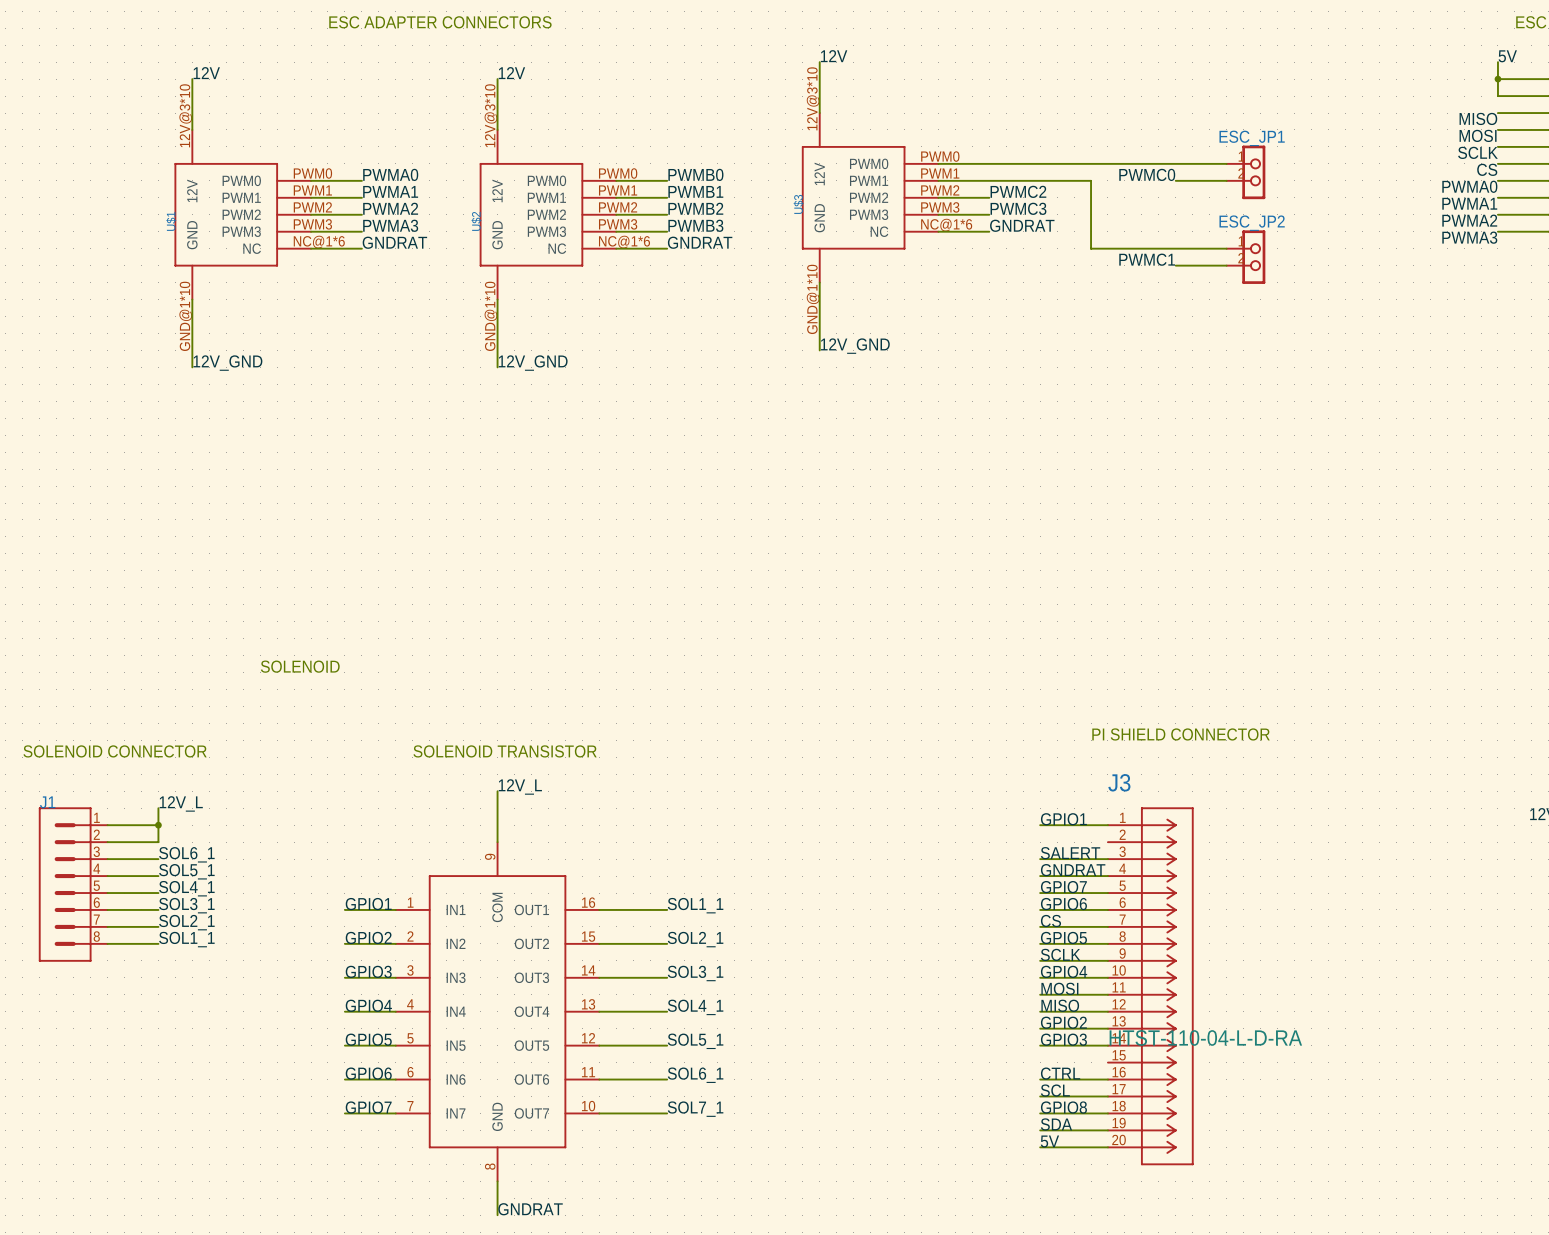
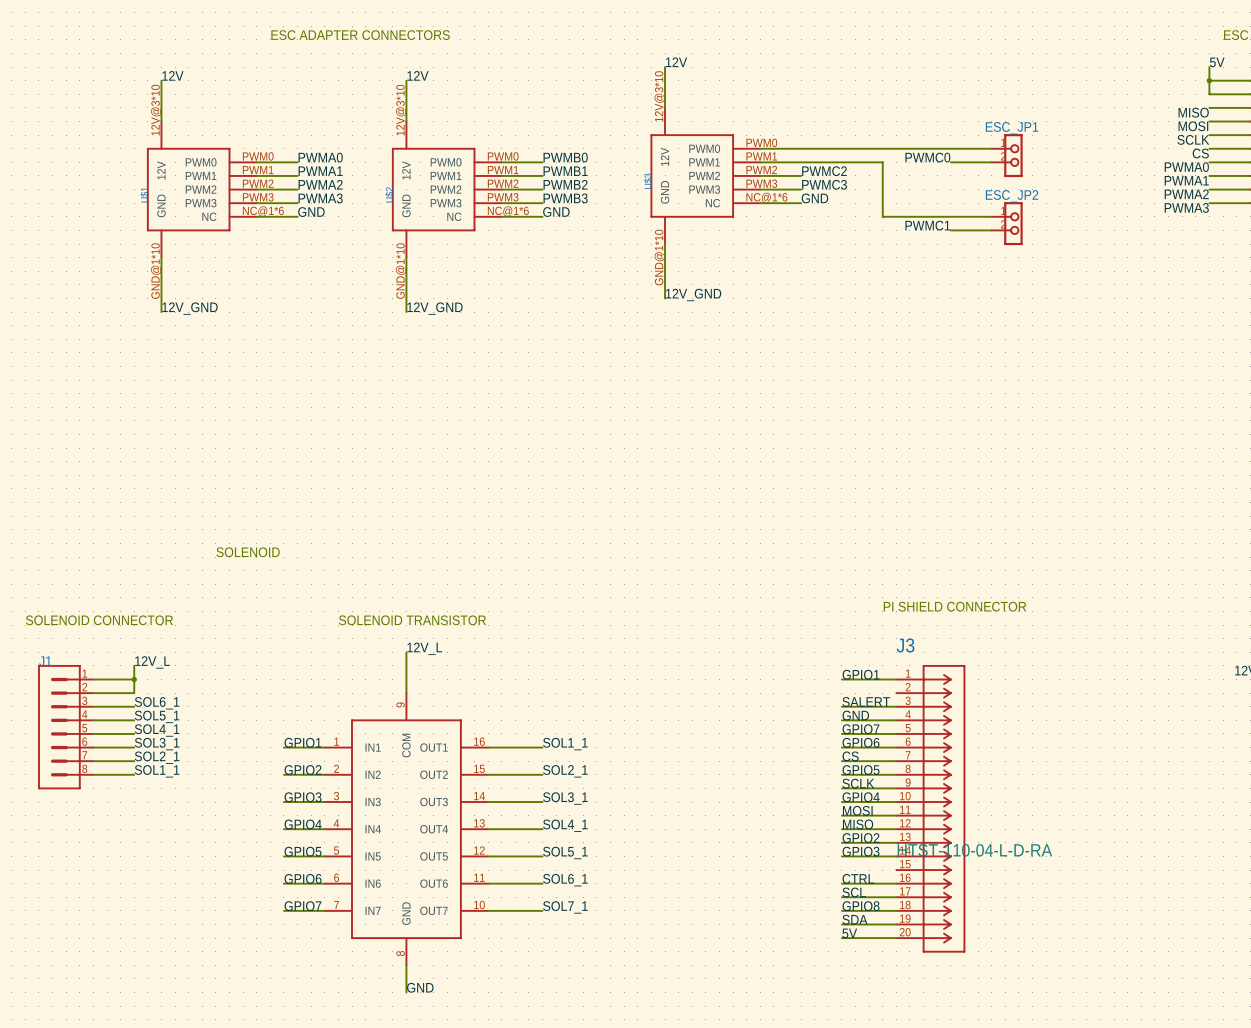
label: GNDRAT (1022, 225) -> GND (814, 198)
label: GNDRAT (394, 242) -> GND (311, 212)
label: GNDRAT (700, 242) -> GND (556, 212)
label: GNDRAT (1073, 870) -> GND (855, 715)
label: GNDRAT (530, 1209) -> GND (420, 987)

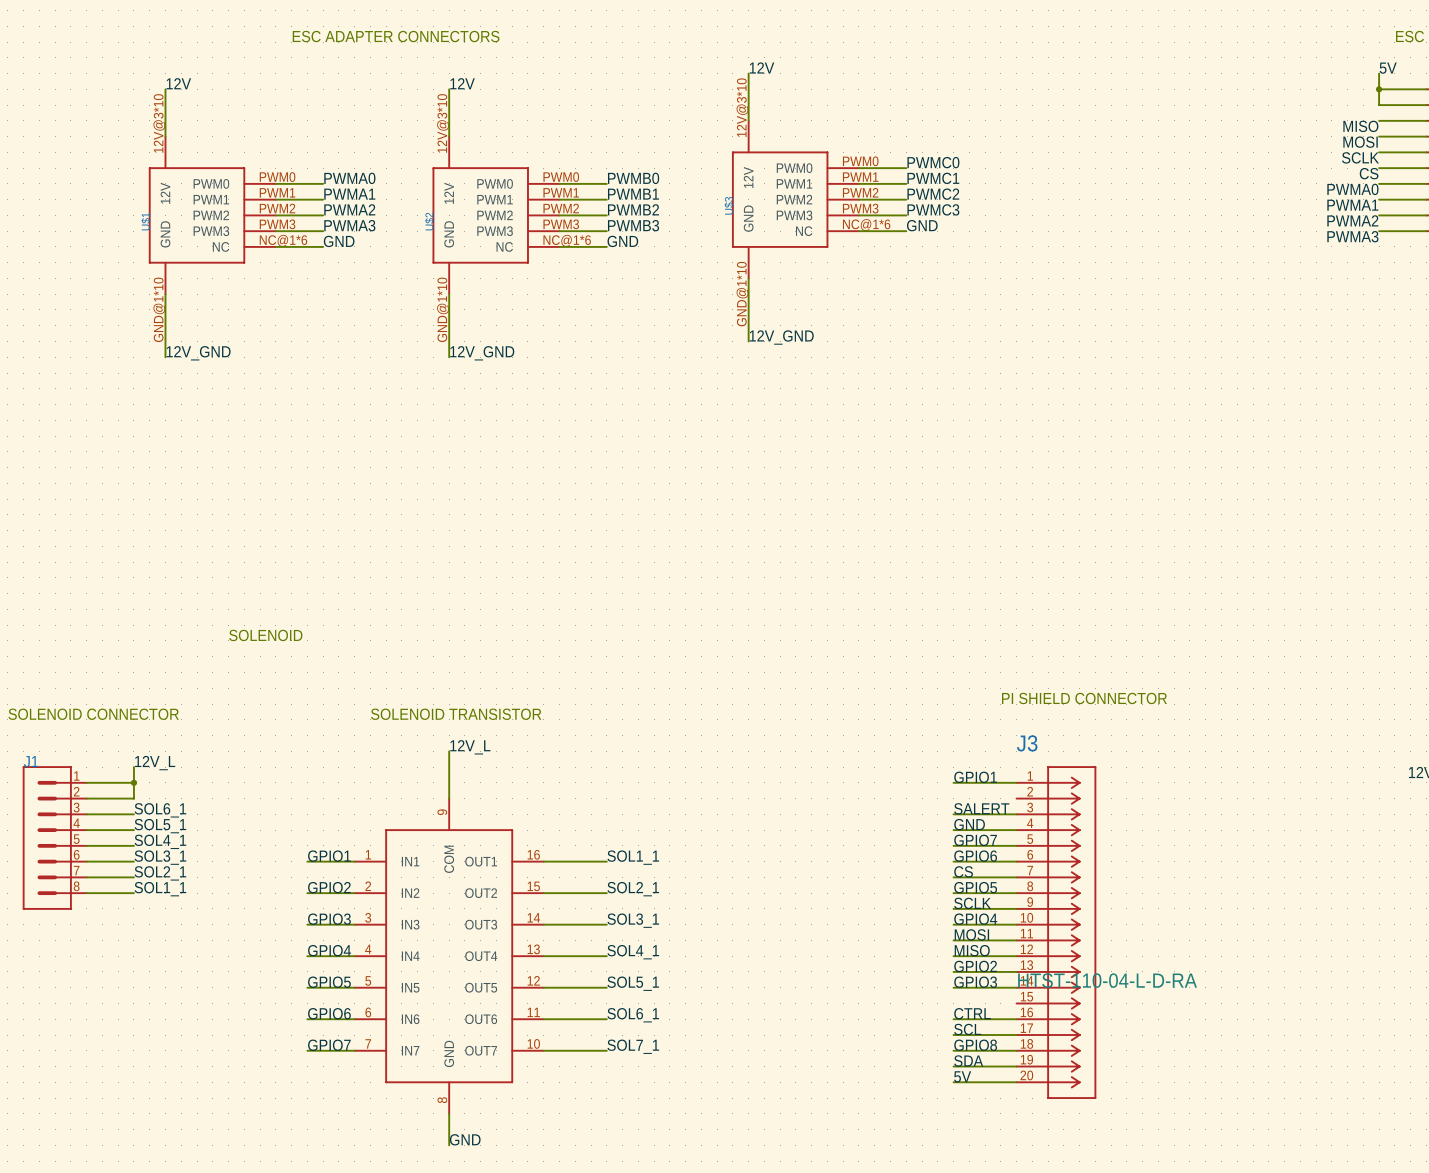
label: none -> PWMC0 (933, 162)
wire: (801, 148) (991, 148) -> none
ESC_JP1: (1007, 155) -> none
label: none -> PWMC1 (933, 178)
label: PWMC0 (927, 157) -> none
wire: (801, 162) (882, 162) (882, 216) (991, 216) -> none
wire: (950, 162) (991, 162) -> none
ESC_JP2: (1007, 223) -> none
label: PWMC1 (927, 225) -> none
wire: (950, 230) (991, 230) -> none

